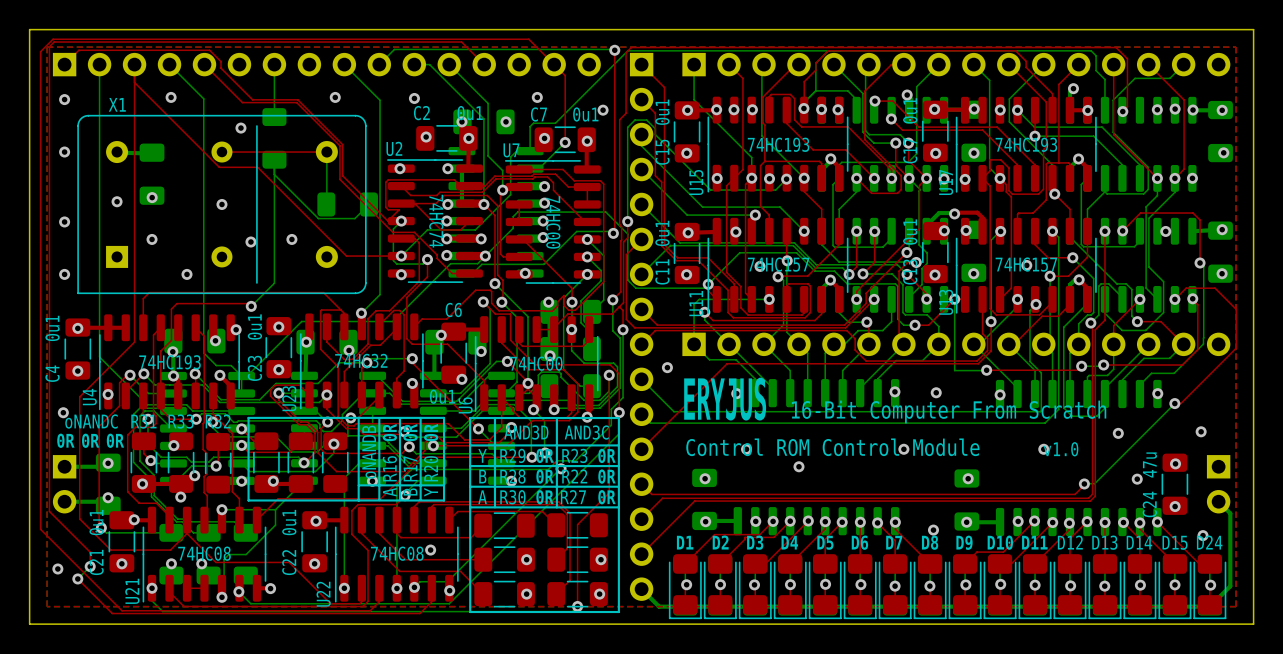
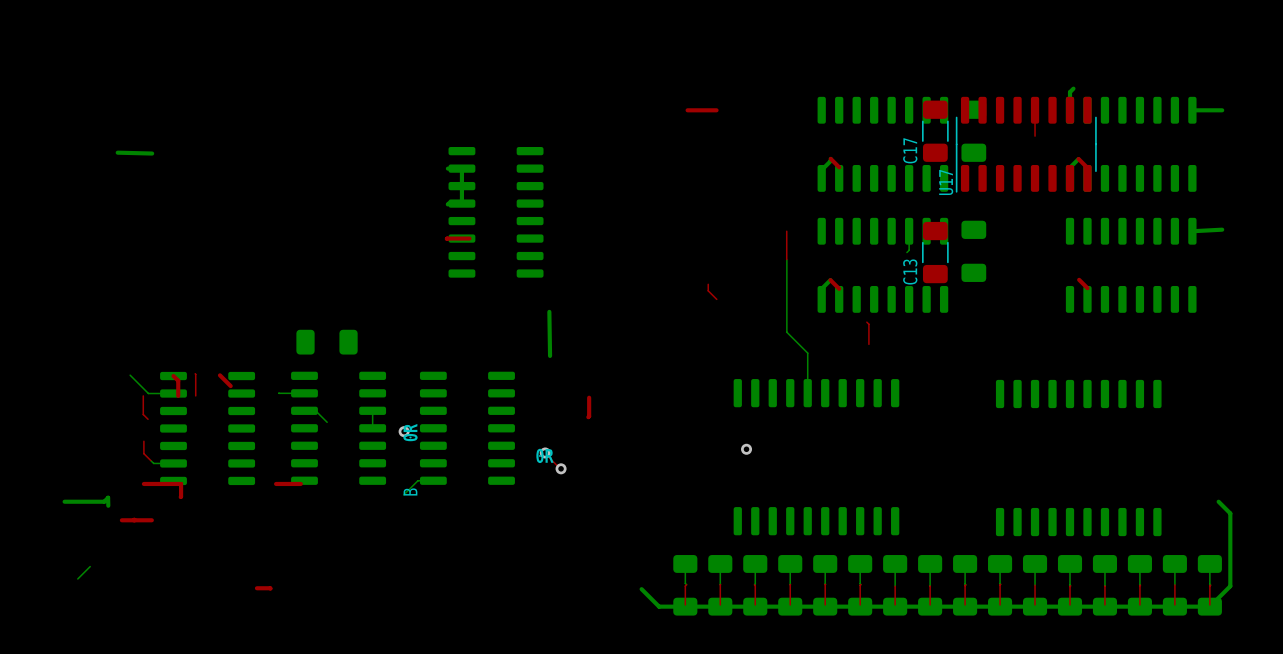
board edge: (29, 29) (1253, 29) (1253, 624) (29, 624) (29, 29) -> none
top zone outline: (47, 47) (1236, 47) (1236, 606) (47, 606) (47, 47) -> none
top track: (614, 50) (613, 233) -> none
bottom track: (614, 50) (394, 49) (379, 64) -> none
via: (614, 50) -> none
bottom track: (828, 50) (815, 63) (815, 90) (803, 102) (803, 108) -> none
top track: (64, 64) (78, 50) (209, 50) (221, 61) (221, 68) (252, 99) (297, 99) (342, 144) (342, 175) (387, 221) -> none
bottom track: (99, 64) (99, 357) (147, 404) (186, 404) (192, 411) (241, 411) -> none
top track: (134, 64) (134, 342) (79, 396) (79, 518) (110, 550) (170, 550) (186, 533) -> none
bottom track: (169, 64) (203, 98) (203, 352) (216, 365) (231, 365) (241, 376) (241, 393) -> none
top track: (204, 64) (242, 102) (296, 102) (339, 145) (339, 179) (392, 232) (414, 232) (452, 273) (469, 273) -> none
bottom track: (274, 64) (274, 117) -> none
part: (326, 64) -> none
bottom track: (344, 64) (380, 100) (380, 294) (361, 313) -> none
bottom track: (414, 64) (429, 64) (483, 118) (483, 204) -> none
bottom track: (449, 64) (488, 103) (488, 156) (502, 170) (502, 190) -> none
top track: (484, 64) (461, 42) (54, 42) (49, 46) (49, 511) (90, 552) (90, 566) -> none
top track: (641, 64) (664, 87) (664, 244) (677, 257) (708, 257) (734, 283) (734, 299) -> none
bottom track: (694, 64) (694, 99) (751, 157) (751, 178) -> none
top track: (729, 64) (742, 78) (742, 169) (726, 185) (726, 272) (740, 286) (740, 307) (748, 315) (802, 315) (804, 312) (804, 299) -> none
top track: (795, 64) (763, 96) (764, 161) -> none
bottom track: (833, 64) (862, 93) (862, 132) (873, 143) (895, 143) -> none
top track: (901, 64) (891, 64) (864, 91) (864, 139) (892, 167) -> none
bottom track: (938, 64) (916, 86) (916, 153) (908, 162) (841, 162) (839, 164) (839, 178) (833, 184) (833, 245) (834, 247) (882, 247) (891, 238) -> none
part: (956, 64) -> none
bottom track: (973, 64) (989, 80) (989, 168) (1000, 178) -> none
top track: (1008, 64) (1046, 102) (1043, 189) (1038, 194) (1012, 194) (1009, 190) (1009, 168) (1000, 159) (990, 159) (990, 170) (982, 178) (990, 185) (990, 308) (996, 314) (1039, 314) (1052, 302) -> none
bottom track: (1043, 64) (1009, 99) (1009, 121) (1054, 167) (1054, 194) -> none
top track: (1078, 64) (1058, 84) (1059, 162) -> none
top track: (1113, 64) (1113, 134) (1157, 178) -> none
top track: (1148, 64) (1184, 99) (1184, 169) (1174, 178) -> none
bottom track: (1183, 64) (1169, 78) (1135, 78) (1113, 100) (1113, 132) (1148, 167) (1148, 189) (1143, 193) (1107, 193) (1104, 191) -> none
bottom track: (761, 66) (761, 135) (804, 178) -> none
bottom track: (865, 67) (865, 130) (869, 134) (900, 134) (908, 143) -> none
top track: (134, 82) (219, 167) (257, 167) (346, 256) (401, 256) -> none
via: (1073, 88) -> none
bottom track: (815, 90) (847, 90) (856, 99) -> none
via: (907, 95) -> none
via: (171, 97) -> none
via: (335, 97) -> none
via: (537, 97) -> none
via: (414, 98) -> none
via: (64, 99) -> none
top track: (641, 99) (655, 113) (655, 175) (661, 182) (661, 245) (676, 260) (698, 260) (728, 290) (728, 312) (733, 317) (805, 317) (810, 312) (810, 286) (808, 283) (788, 283) (786, 285) (786, 299) -> none
top track: (874, 101) (892, 101) (915, 123) -> none
via: (874, 101) -> none
via: (803, 108) -> none
via: (716, 109) -> none
via: (733, 109) -> none
via: (752, 109) -> none
via: (821, 109) -> none
via: (837, 109) -> none
via: (934, 109) -> none
top track: (935, 109) (964, 109) -> none
via: (974, 109) -> none
via: (1157, 109) -> none
via: (1175, 109) -> none
via: (603, 110) -> none
via: (687, 110) -> none
top track: (769, 110) (769, 96) (771, 94) (790, 94) (794, 98) (794, 119) (801, 126) (848, 126) (891, 170) (891, 178) -> none
top track: (786, 110) (786, 123) (813, 149) (845, 149) (874, 178) -> none
top track: (804, 110) (804, 81) (815, 70) (815, 63) (828, 50) (1015, 50) (1026, 61) (1026, 67) (1052, 93) (1052, 110) -> none
text: 0u1 (910, 110) -> none
via: (1000, 110) -> none
bottom track: (1017, 110) (1034, 127) (1102, 127) (1139, 164) (1139, 178) -> none
via: (1017, 110) -> none
top track: (1070, 110) (1087, 110) -> none
via: (1087, 110) -> none
bottom track: (1104, 110) (1104, 79) (1096, 70) (1096, 55) (1091, 50) (627, 50) (555, 123) (533, 123) (530, 126) (530, 151) (516, 151) (510, 157) (510, 194) (475, 229) (427, 229) (401, 256) -> none
via: (1193, 110) -> none
via: (1222, 110) -> none
top track: (1122, 111) (1127, 106) (1127, 58) (1116, 47) (631, 47) (626, 52) (626, 113) (619, 119) (620, 291) (612, 299) -> none
via: (1122, 111) -> none
text: 0u1 (662, 112) -> none
text: 0u1 (470, 113) -> none
text: 0u1 (585, 114) -> none
top track: (891, 118) (902, 130) (982, 130) (1017, 164) (1017, 178) -> none
via: (891, 118) -> none
via: (461, 121) -> none
part: (483, 121) -> none
via: (506, 121) -> none
top track: (915, 123) (918, 127) (997, 127) (1035, 164) (1035, 178) -> none
via: (240, 128) -> none
C15: (687, 131) -> none
part: (1220, 131) -> none
bottom track: (641, 134) (641, 146) (702, 207) (780, 207) (804, 231) -> none
bottom track: (1034, 136) (1093, 136) (1122, 164) (1122, 178) -> none
via: (1034, 136) -> none
via: (426, 137) -> none
part: (274, 138) -> none
C2: (446, 138) -> none
top track: (468, 138) (468, 167) -> none
via: (468, 138) -> none
via: (544, 138) -> none
C7: (565, 139) -> none
top track: (586, 141) (586, 168) -> none
via: (587, 141) -> none
top track: (565, 142) (565, 75) (528, 39) (53, 39) (40, 51) (40, 529) (122, 610) (370, 610) (379, 601) (379, 588) -> none
bottom track: (565, 142) (539, 168) -> none
via: (565, 142) -> none
top track: (895, 143) (895, 165) (909, 178) -> none
via: (895, 143) -> none
top track: (908, 143) (908, 160) (926, 178) (919, 185) (919, 228) (856, 291) (856, 299) -> none
via: (908, 143) -> none
U15: (778, 144) -> none
text: 74HC193 (778, 144) -> none
text: 74HC193 (1026, 144) -> none
via: (64, 152) -> none
top track: (221, 152) (326, 152) -> none
bottom track: (326, 152) (326, 203) -> none
via: (1223, 152) -> none
via: (686, 153) -> none
via: (935, 153) -> none
via: (973, 153) -> none
via: (830, 158) -> none
via: (1078, 158) -> none
bottom track: (274, 159) (274, 283) (251, 306) -> none
top track: (764, 161) (760, 165) (760, 206) (769, 215) (769, 231) -> none
top track: (764, 161) (819, 161) (821, 163) (821, 178) -> none
top track: (893, 167) (901, 175) (901, 189) (897, 193) (871, 193) (856, 178) -> none
via: (399, 168) -> none
via: (447, 168) -> none
top track: (519, 169) (562, 169) (574, 180) (600, 180) (603, 184) (603, 281) (575, 310) (568, 310) (564, 305) (564, 295) (552, 311) (499, 310) (491, 303) (490, 290) (475, 290) (446, 319) (422, 319) (414, 326) -> none
bottom track: (641, 169) (687, 215) (755, 215) -> none
part: (152, 174) -> none
bottom track: (274, 174) (318, 218) (354, 218) (369, 204) -> none
via: (717, 178) -> none
top track: (751, 178) (745, 184) (745, 293) (751, 299) -> none
via: (751, 178) -> none
via: (769, 178) -> none
top track: (804, 178) (804, 191) (821, 209) (821, 231) -> none
via: (804, 178) -> none
bottom track: (856, 178) (856, 191) (839, 209) (839, 231) -> none
via: (856, 178) -> none
via: (874, 178) -> none
via: (891, 178) -> none
bottom track: (909, 178) (920, 189) (919, 244) (927, 253) (927, 263) (922, 268) (922, 284) (909, 297) -> none
via: (909, 178) -> none
via: (926, 178) -> none
top track: (1000, 178) (1006, 184) (1006, 191) (1011, 197) (1011, 288) (1000, 299) -> none
via: (1000, 178) -> none
top track: (1052, 178) (1052, 191) (1070, 209) (1070, 231) -> none
top track: (1070, 178) (1068, 162) (1046, 164) (1046, 199) (1033, 213) (1017, 214) (1017, 231) -> none
bottom track: (1087, 178) (1081, 184) (1081, 244) (1083, 246) (1134, 246) (1139, 241) -> none
bottom track: (1157, 178) (1157, 195) (1146, 206) (1146, 288) (1157, 299) -> none
via: (1157, 178) -> none
bottom track: (1174, 178) (1174, 192) (1148, 218) (1148, 266) (1163, 281) (1163, 312) (1145, 330) (1122, 330) (1104, 313) (1104, 299) -> none
via: (1174, 178) -> none
via: (1192, 178) -> none
bottom track: (786, 179) (775, 190) (710, 190) (655, 134) (655, 128) (646, 120) (635, 120) (627, 127) (627, 221) -> none
via: (786, 179) -> none
via: (944, 179) -> none
via: (965, 179) -> none
top track: (401, 186) (410, 195) (436, 195) (439, 192) (482, 192) (495, 178) (547, 176) (553, 182) (553, 190) (585, 221) -> none
top track: (460, 186) (454, 179) (388, 179) (385, 182) (385, 207) (388, 209) (399, 209) (387, 221) -> none
top track: (469, 186) (484, 186) (494, 176) (555, 174) (568, 186) (587, 186) (587, 204) -> none
top track: (519, 186) (505, 186) (500, 192) (500, 254) (503, 256) (519, 256) -> none
via: (544, 186) -> none
via: (502, 190) -> none
bottom track: (1104, 191) (1087, 209) (1087, 231) -> none
via: (1054, 194) -> none
via: (152, 197) -> none
via: (117, 201) -> none
top track: (401, 203) (436, 203) (444, 195) (487, 195) (497, 205) (497, 275) (502, 280) (501, 302) -> none
top track: (414, 203) (441, 229) (460, 229) (469, 221) -> none
top track: (469, 203) (483, 203) (494, 215) (494, 283) -> none
via: (544, 203) -> none
X1: (221, 204) -> none
via: (221, 204) -> none
part: (347, 204) -> none
via: (447, 204) -> none
via: (483, 204) -> none
top track: (519, 204) (519, 221) -> none
bottom track: (641, 204) (680, 242) (794, 242) (816, 264) (897, 264) (907, 274) -> none
top track: (954, 213) (977, 212) (982, 217) (982, 231) -> none
bottom track: (954, 213) (939, 213) (926, 225) -> none
via: (954, 213) -> none
via: (755, 215) -> none
via: (64, 221) -> none
bottom track: (401, 221) (393, 229) (393, 260) (396, 264) (423, 264) (427, 259) -> none
via: (401, 221) -> none
U2: (435, 221) -> none
text: 74HC74 (436, 221) -> none
via: (446, 221) -> none
via: (543, 221) -> none
U7: (552, 221) -> none
top track: (627, 221) (627, 237) (623, 241) (623, 302) (612, 314) (567, 314) (554, 327) -> none
via: (627, 221) -> none
text: 74HC00 (553, 222) -> none
via: (1222, 229) -> none
via: (944, 230) -> none
via: (966, 230) -> none
top track: (1122, 230) (1140, 213) (1193, 213) (1200, 220) (1200, 262) -> none
via: (1122, 230) -> none
top track: (716, 231) (688, 232) -> none
via: (804, 231) -> none
bottom track: (821, 231) (821, 244) (839, 262) (916, 262) -> none
top track: (839, 231) (839, 244) (807, 276) (779, 276) -> none
top track: (856, 231) (856, 266) (849, 274) -> none
via: (856, 231) -> none
top track: (874, 231) (874, 262) (863, 274) -> none
via: (874, 231) -> none
bottom track: (1000, 231) (991, 240) (991, 321) -> none
via: (1000, 231) -> none
top track: (1035, 231) (1035, 244) (1048, 257) (1072, 257) -> none
bottom track: (1052, 231) (1058, 237) (1058, 409) (1045, 423) (650, 423) (641, 414) -> none
via: (1052, 231) -> none
top track: (1087, 231) (1087, 257) (1068, 276) (1050, 276) -> none
top track: (1104, 231) (1104, 320) (1095, 329) (1095, 496) (1090, 501) (694, 501) (641, 554) -> none
via: (1104, 231) -> none
via: (1165, 231) -> none
via: (688, 232) -> none
via: (735, 232) -> none
text: 0u1 (910, 232) -> none
bottom track: (613, 233) (611, 231) (576, 231) (543, 264) (481, 264) (472, 273) -> none
via: (613, 233) -> none
text: 0u1 (662, 233) -> none
bottom track: (1070, 236) (1116, 283) (1126, 283) (1131, 289) (1131, 316) (1137, 321) -> none
via: (543, 237) -> none
top track: (401, 238) (414, 238) (419, 243) (419, 281) (389, 310) (376, 310) (368, 318) (368, 344) (352, 359) (344, 359) (326, 342) (326, 326) -> none
via: (446, 238) -> none
via: (481, 238) -> none
via: (152, 239) -> none
via: (291, 239) -> none
top track: (523, 239) (572, 288) (572, 304) -> none
bottom track: (587, 239) (603, 255) (603, 300) (592, 311) -> none
via: (587, 239) -> none
top track: (641, 239) (626, 254) (626, 319) (634, 327) (845, 327) (874, 299) -> none
via: (250, 242) -> none
bottom track: (670, 245) (646, 269) -> none
bottom track: (670, 245) (793, 245) (815, 267) (842, 267) (849, 274) -> none
top track: (906, 252) (866, 293) (866, 303) (844, 325) (657, 325) (641, 309) -> none
via: (906, 252) -> none
part: (1220, 252) -> none
C11: (687, 253) -> none
via: (446, 255) -> none
via: (401, 256) -> none
via: (485, 256) -> none
bottom track: (587, 256) (600, 270) (600, 280) (581, 300) (581, 322) (592, 333) (592, 349) -> none
via: (587, 256) -> none
bottom track: (1072, 257) (1093, 278) (1093, 312) (1087, 315) (1078, 323) (1078, 344) (1070, 353) (1070, 393) -> none
via: (1072, 257) -> none
top track: (427, 259) (427, 276) (406, 297) (406, 338) (412, 344) (447, 344) (484, 380) (484, 397) -> none
via: (427, 259) -> none
via: (787, 260) -> none
top track: (916, 262) (907, 262) (899, 271) (899, 339) -> none
via: (916, 262) -> none
bottom track: (1200, 262) (1203, 266) (1203, 344) (1174, 373) (1151, 373) (1139, 384) -> none
via: (1200, 262) -> none
text: 74HC157 (778, 264) -> none
text: 74HC157 (1026, 264) -> none
U11: (778, 265) -> none
U13: (1026, 265) -> none
via: (1026, 265) -> none
via: (760, 266) -> none
via: (525, 273) -> none
via: (863, 273) -> none
via: (973, 273) -> none
via: (1222, 273) -> none
via: (64, 274) -> none
via: (186, 274) -> none
via: (401, 274) -> none
bottom track: (587, 274) (563, 298) (563, 369) (580, 386) (592, 386) -> none
via: (587, 274) -> none
via: (686, 274) -> none
via: (849, 274) -> none
bottom track: (863, 274) (892, 274) (902, 284) (902, 312) (905, 314) (927, 314) (938, 326) (938, 344) (922, 360) (896, 360) (877, 379) (877, 393) -> none
top track: (907, 274) (926, 294) (926, 299) -> none
via: (907, 274) -> none
via: (935, 274) -> none
via: (778, 276) -> none
bottom track: (779, 276) (783, 280) (783, 324) (764, 344) (790, 370) (790, 393) -> none
bottom track: (1050, 276) (1050, 338) -> none
via: (1050, 276) -> none
bottom track: (1079, 279) (1074, 279) (1070, 284) (1070, 288) -> none
via: (1079, 279) -> none
via: (830, 280) -> none
bottom track: (494, 283) (528, 316) (528, 383) -> none
via: (494, 283) -> none
via: (708, 284) -> none
bottom track: (1122, 297) (1108, 283) (1101, 283) (1098, 286) (1098, 315) (1090, 323) -> none
via: (1192, 298) -> none
bottom track: (612, 299) (612, 330) (620, 337) (620, 387) (599, 408) (554, 408) -> none
via: (612, 299) -> none
bottom track: (769, 299) (699, 299) (694, 304) (694, 344) (709, 359) (736, 359) (755, 379) (755, 393) -> none
via: (769, 299) -> none
top track: (821, 299) (821, 313) (814, 320) (713, 320) (704, 312) -> none
bottom track: (839, 299) (839, 312) (848, 322) (866, 322) -> none
via: (856, 299) -> none
via: (874, 299) -> none
bottom track: (891, 299) (891, 321) (882, 330) (858, 330) (844, 344) -> none
via: (926, 299) -> none
bottom track: (944, 299) (954, 299) (954, 370) (986, 370) -> none
via: (954, 299) -> none
top track: (964, 299) (954, 299) (928, 325) (915, 325) -> none
top track: (982, 299) (982, 333) (987, 338) (987, 350) (977, 361) (866, 361) (855, 350) (855, 338) (846, 330) (655, 330) (641, 344) -> none
bottom track: (1017, 299) (1017, 306) (979, 344) -> none
via: (1017, 299) -> none
top track: (1139, 299) (1113, 325) (1113, 344) -> none
via: (1139, 299) -> none
top track: (1174, 299) (1186, 288) (1215, 288) (1236, 309) (1236, 348) (1180, 403) (1174, 403) -> none
via: (1174, 299) -> none
top track: (1192, 299) (1197, 304) (1197, 349) (1182, 365) (1103, 365) -> none
top track: (483, 301) (495, 314) (510, 314) (510, 340) (535, 364) (610, 364) (619, 373) (619, 412) -> none
bottom track: (483, 301) (490, 308) (490, 363) (460, 393) (433, 393) -> none
via: (483, 301) -> none
bottom track: (501, 302) (517, 317) (517, 382) (505, 393) -> none
via: (501, 302) -> none
via: (548, 302) -> none
via: (572, 302) -> none
bottom track: (1087, 303) (1063, 327) (1063, 407) (1072, 416) (1096, 416) (1104, 408) (1104, 393) -> none
bottom track: (572, 304) (571, 350) (584, 363) (613, 363) (617, 366) (617, 386) (598, 405) (576, 405) (571, 400) (485, 400) (474, 411) (433, 411) -> none
bottom track: (1036, 304) (1030, 310) (1030, 361) (1041, 372) (1040, 411) (673, 411) (641, 379) -> none
via: (1036, 304) -> none
top track: (1070, 304) (1058, 316) (1042, 316) (1014, 344) -> none
top track: (251, 306) (248, 303) (176, 303) (171, 309) (171, 340) (160, 351) (160, 409) (170, 419) (196, 419) -> none
via: (251, 306) -> none
top track: (619, 306) (623, 310) (623, 329) -> none
top track: (340, 310) (320, 310) (320, 349) (338, 366) (338, 416) (347, 425) (354, 425) (356, 423) (448, 423) (464, 439) (489, 439) (501, 427) (501, 397) (520, 417) (566, 417) (571, 412) (571, 397) -> none
part: (570, 311) -> none
bottom track: (704, 312) (704, 320) (772, 388) -> none
via: (704, 312) -> none
via: (361, 313) -> none
top track: (991, 321) (991, 350) (978, 363) (727, 363) (641, 449) -> none
via: (991, 321) -> none
top track: (1137, 321) (1160, 321) (1183, 344) -> none
via: (1137, 321) -> none
via: (866, 322) -> none
top track: (1090, 323) (1092, 324) (1092, 494) (1088, 498) (662, 498) (641, 519) -> none
via: (1090, 323) -> none
top track: (143, 325) (143, 298) (149, 292) (323, 292) (344, 313) (344, 326) -> none
top track: (379, 325) (393, 310) (399, 310) (404, 314) (404, 371) (396, 378) (396, 395) -> none
bottom track: (915, 325) (903, 325) (897, 319) (897, 286) (895, 283) (847, 283) (834, 271) (814, 271) (796, 252) (739, 252) (704, 288) (635, 288) (627, 280) (627, 234) (605, 212) (517, 212) (513, 216) (513, 228) (477, 263) (450, 263) (392, 321) (301, 321) (247, 376) -> none
via: (915, 325) -> none
part: (641, 326) -> none
top track: (78, 327) (125, 327) -> none
top track: (160, 327) (153, 335) (153, 413) (156, 415) (156, 423) (152, 427) (135, 427) (127, 435) (127, 491) (139, 503) (156, 503) (169, 516) -> none
top track: (195, 327) (204, 336) (203, 449) (207, 453) (207, 473) (204, 476) (204, 492) (207, 495) (207, 516) -> none
text: 0u1 (254, 327) -> none
via: (278, 327) -> none
text: 0u1 (52, 328) -> none
via: (77, 328) -> none
top track: (396, 328) (380, 345) (370, 345) (344, 371) (344, 395) -> none
via: (236, 329) -> none
top track: (455, 329) (484, 329) -> none
top track: (501, 329) (501, 342) (528, 369) (563, 369) (577, 383) (577, 412) (569, 420) (532, 420) (507, 445) (433, 445) -> none
top track: (519, 329) (519, 342) (522, 346) (583, 346) (589, 340) -> none
top track: (536, 329) (554, 329) -> none
via: (571, 329) -> none
bottom track: (623, 329) (623, 397) (611, 409) (611, 425) (575, 460) (557, 460) (548, 469) (411, 469) -> none
via: (623, 329) -> none
via: (441, 335) -> none
via: (215, 340) -> none
part: (194, 341) -> none
bottom track: (306, 342) (305, 374) -> none
via: (306, 342) -> none
bottom track: (434, 342) (434, 374) -> none
part: (455, 342) -> none
bottom track: (833, 344) (825, 353) (825, 393) -> none
bottom track: (868, 344) (842, 370) (842, 393) -> none
bottom track: (903, 344) (860, 388) -> none
part: (956, 344) -> none
bottom track: (973, 344) (1017, 388) -> none
bottom track: (1008, 344) (1035, 370) (1035, 393) -> none
bottom track: (1043, 344) (1052, 353) (1052, 393) -> none
bottom track: (1113, 344) (1113, 369) (1107, 375) (1089, 375) (1087, 393) -> none
bottom track: (1148, 344) (1104, 388) -> none
bottom track: (1183, 344) (1169, 358) (1143, 358) (1122, 379) (1122, 393) -> none
C23: (278, 347) -> none
C4: (77, 349) -> none
part: (570, 349) -> none
via: (349, 350) -> none
via: (172, 351) -> none
bottom track: (173, 351) (173, 375) -> none
via: (481, 351) -> none
C6: (453, 353) -> none
via: (550, 355) -> none
top track: (412, 358) (412, 362) (478, 428) -> none
bottom track: (412, 358) (371, 358) (366, 362) (338, 362) (318, 383) (276, 383) (259, 399) (221, 399) (195, 373) -> none
via: (412, 358) -> none
text: 74HC32 (361, 360) -> none
U23: (361, 361) -> none
top track: (507, 361) (528, 382) (528, 389) (536, 397) -> none
bottom track: (507, 361) (496, 361) (456, 401) (402, 401) (377, 375) -> none
via: (507, 361) -> none
U4: (169, 362) -> none
text: 74HC193 (170, 362) -> none
top track: (366, 362) (361, 367) (361, 395) -> none
via: (366, 362) -> none
text: 74HC00 (536, 363) -> none
U6: (536, 364) -> none
bottom track: (1103, 365) (1081, 366) -> none
via: (1103, 365) -> none
top track: (1081, 366) (1077, 370) (986, 370) -> none
via: (1081, 366) -> none
via: (667, 367) -> none
via: (278, 369) -> none
via: (986, 370) -> none
via: (77, 371) -> none
top track: (143, 373) (125, 391) -> none
bottom track: (143, 373) (154, 384) (169, 384) -> none
via: (143, 373) -> none
via: (195, 373) -> none
top track: (130, 375) (127, 375) (119, 382) (119, 405) (99, 426) (99, 525) (101, 527) -> none
via: (130, 375) -> none
via: (219, 375) -> none
bottom track: (488, 375) (460, 404) (400, 404) (389, 393) (372, 393) -> none
top track: (609, 375) (609, 492) (577, 524) (577, 606) -> none
bottom track: (609, 375) (609, 391) (599, 400) (584, 400) (561, 377) (559, 372) (541, 372) (538, 375) (538, 384) (529, 393) (501, 393) -> none
via: (609, 375) -> none
via: (173, 376) -> none
via: (461, 379) -> none
via: (412, 383) -> none
via: (528, 383) -> none
bottom track: (169, 384) (202, 384) (219, 402) (319, 402) (326, 395) -> none
part: (570, 386) -> none
top track: (528, 388) (519, 397) -> none
via: (894, 391) -> none
via: (936, 392) -> none
top track: (278, 393) (278, 399) (300, 422) (307, 422) (317, 432) (317, 452) (336, 471) (404, 471) (425, 450) (425, 442) (430, 437) (438, 437) (444, 442) (499, 442) (514, 427) -> none
via: (278, 393) -> none
bottom track: (363, 393) (342, 414) (342, 420) (331, 431) (323, 431) (316, 420) (233, 422) (225, 413) (201, 413) (196, 419) -> none
via: (736, 393) -> none
via: (1157, 393) -> none
via: (108, 394) -> none
via: (1000, 394) -> none
top track: (213, 395) (213, 414) (232, 433) (232, 491) (239, 498) (239, 520) -> none
top track: (309, 395) (299, 385) (275, 385) (270, 390) (270, 396) (299, 424) (306, 424) (314, 433) (314, 452) (304, 463) -> none
top track: (326, 395) (326, 409) (346, 428) (357, 428) (363, 434) (401, 434) (404, 431) -> none
via: (326, 395) -> none
top track: (379, 396) (358, 417) (350, 417) -> none
text: 0u1 (442, 396) -> none
text: ERYJUS (725, 399) -> none
bottom track: (1174, 403) (1094, 483) (1085, 483) -> none
via: (1174, 403) -> none
bottom track: (170, 408) (139, 408) (133, 414) (133, 462) (151, 480) (151, 496) (176, 521) (182, 521) (193, 532) (205, 532) -> none
via: (533, 409) -> none
via: (554, 409) -> none
bottom track: (501, 410) (482, 410) (456, 437) (409, 437) (404, 431) -> none
bottom track: (534, 411) (544, 420) (544, 452) -> none
via: (63, 412) -> none
bottom track: (619, 412) (619, 433) (449, 603) (250, 603) (238, 591) -> none
via: (619, 412) -> none
text: 16-Bit Computer From Scratch (949, 412) -> none
line: (248, 417) (248, 500) (444, 500) (444, 417) (248, 417) -> none
bottom track: (350, 417) (347, 420) (347, 435) -> none
via: (350, 417) -> none
line: (358, 417) (358, 500) -> none
line: (420, 417) (420, 499) -> none
line: (494, 417) (494, 507) -> none
via: (587, 417) -> none
line: (379, 418) (379, 500) -> none
line: (399, 418) (399, 500) -> none
line: (556, 418) (556, 507) -> none
bottom track: (148, 419) (148, 444) (161, 457) (186, 457) (191, 461) (209, 461) (213, 457) (298, 457) (304, 462) -> none
via: (148, 419) -> none
via: (196, 419) -> none
text: oNANDC (91, 421) -> none
bottom track: (212, 422) (212, 427) (222, 436) (276, 436) (291, 451) (317, 451) (330, 435) (381, 435) (389, 442) -> none
via: (212, 422) -> none
top track: (327, 422) (321, 428) (321, 449) (325, 453) (402, 453) (409, 445) -> none
via: (327, 422) -> none
via: (511, 427) -> none
bottom track: (171, 428) (154, 411) (145, 411) (140, 415) (140, 461) (154, 475) (154, 495) (177, 519) (183, 519) (186, 521) (234, 521) (245, 532) -> none
top track: (241, 428) (254, 441) (266, 441) -> none
via: (241, 428) -> none
bottom track: (433, 428) (461, 428) (485, 404) (514, 404) (531, 421) (531, 457) -> none
bottom track: (478, 428) (495, 445) -> none
via: (478, 428) -> none
via: (1201, 431) -> none
text: 0R (389, 432) -> none
text: 0R (431, 432) -> none
text: AND3D (526, 432) -> none
text: AND3C (586, 432) -> none
via: (1118, 433) -> none
text: 0R (65, 440) -> none
text: 0R (90, 440) -> none
text: 0R (115, 440) -> none
top track: (218, 441) (218, 464) (216, 466) -> none
top track: (300, 441) (289, 452) (248, 452) (241, 445) -> none
bottom track: (389, 443) (409, 463) (433, 463) -> none
bottom track: (333, 444) (333, 453) (315, 471) (249, 471) (241, 463) -> none
via: (333, 444) -> none
via: (173, 445) -> none
via: (241, 445) -> none
bottom track: (372, 445) (387, 445) (411, 469) -> none
via: (433, 445) -> none
line: (470, 445) (618, 445) -> none
bottom track: (409, 446) (416, 453) (492, 453) (501, 463) -> none
via: (409, 446) -> none
text: Control ROM Control Module (832, 447) -> none
via: (903, 449) -> none
via: (1043, 449) -> none
text: v1.0 (1061, 449) -> none
text: oNANDB (369, 452) -> none
text: Y (482, 455) -> none
text: 0R (606, 455) -> none
top track: (531, 457) (422, 457) (380, 498) (278, 498) (256, 520) -> none
via: (532, 457) -> none
via: (150, 460) -> none
R31: (143, 462) -> none
R33: (181, 462) -> none
R16: (266, 462) -> none
R17: (300, 462) -> none
via: (304, 462) -> none
R20: (335, 462) -> none
via: (108, 463) -> none
R32: (218, 463) -> none
bottom track: (372, 463) (359, 463) (344, 478) (344, 588) -> none
via: (1175, 463) -> none
text: 47u (1149, 464) -> none
bottom track: (64, 466) (104, 466) -> none
bottom track: (216, 466) (191, 466) (176, 480) -> none
via: (216, 466) -> none
line: (470, 466) (618, 466) -> none
via: (798, 466) -> none
bottom track: (560, 468) (447, 581) (420, 581) (414, 587) -> none
bottom track: (411, 469) (396, 484) (396, 588) -> none
via: (194, 475) -> none
text: B (482, 476) -> none
text: 0R (545, 476) -> none
text: 0R (606, 476) -> none
via: (705, 478) -> none
via: (968, 478) -> none
via: (1137, 479) -> none
bottom track: (304, 480) (275, 509) -> none
via: (241, 481) -> none
via: (273, 481) -> none
via: (372, 481) -> none
via: (511, 481) -> none
via: (142, 483) -> none
via: (1084, 483) -> none
part: (64, 484) -> none
part: (108, 484) -> none
top track: (641, 484) (651, 494) (1075, 494) (1085, 484) -> none
C24: (1174, 484) -> none
part: (1218, 484) -> none
line: (358, 485) (444, 485) -> none
line: (470, 486) (617, 486) -> none
text: A (389, 492) -> none
text: Y (431, 492) -> none
top track: (405, 495) (396, 504) (358, 504) (351, 510) (351, 534) (368, 550) (368, 601) (362, 606) (183, 606) (169, 592) -> none
via: (405, 495) -> none
via: (108, 497) -> none
via: (180, 497) -> none
text: A (482, 497) -> none
text: 0R (545, 497) -> none
text: 0R (606, 497) -> none
part: (704, 499) -> none
part: (966, 499) -> none
via: (1175, 506) -> none
line: (470, 507) (470, 612) (618, 612) (618, 418) (470, 418) (470, 507) -> none
line: (470, 507) (618, 507) -> none
bottom track: (221, 509) (275, 509) -> none
via: (221, 509) -> none
bottom track: (275, 509) (275, 525) (246, 554) (228, 554) (224, 559) (224, 595) (221, 597) -> none
via: (134, 519) -> none
top track: (316, 520) (344, 520) -> none
top track: (361, 520) (361, 533) (399, 571) (460, 571) (483, 594) -> none
top track: (379, 520) (379, 533) (405, 559) (483, 559) -> none
top track: (396, 520) (396, 533) (400, 537) (471, 537) (483, 525) -> none
top track: (414, 520) (414, 506) (419, 501) (558, 501) (570, 513) (570, 580) (556, 594) -> none
top track: (431, 520) (431, 506) (433, 504) (557, 504) (567, 514) (567, 548) (556, 559) -> none
top track: (449, 520) (457, 511) (542, 511) (556, 525) -> none
bottom track: (704, 520) (737, 520) -> none
via: (316, 521) -> none
via: (705, 521) -> none
via: (755, 521) -> none
top track: (773, 521) (759, 534) (714, 534) (685, 563) -> none
via: (773, 521) -> none
top track: (790, 521) (774, 537) (745, 537) (720, 563) -> none
via: (790, 521) -> none
top track: (808, 521) (765, 563) -> none
via: (808, 521) -> none
top track: (825, 521) (825, 528) (790, 563) -> none
via: (825, 521) -> none
via: (1018, 521) -> none
top track: (1034, 521) (1003, 552) (976, 552) (965, 563) -> none
via: (1034, 521) -> none
top track: (1087, 521) (1070, 538) (1070, 563) -> none
via: (1087, 521) -> none
text: 0u1 (96, 522) -> none
text: 0u1 (289, 522) -> none
top track: (842, 522) (825, 539) (825, 563) -> none
via: (842, 522) -> none
top track: (860, 522) (860, 563) -> none
via: (860, 522) -> none
top track: (877, 522) (895, 540) (895, 563) -> none
via: (877, 522) -> none
top track: (895, 522) (895, 529) (930, 563) -> none
via: (895, 522) -> none
bottom track: (966, 522) (999, 522) -> none
via: (966, 522) -> none
top track: (1052, 522) (1011, 563) -> none
via: (1052, 522) -> none
top track: (1104, 522) (1104, 563) -> none
via: (1105, 522) -> none
top track: (1123, 522) (1139, 538) (1139, 563) -> none
via: (1123, 522) -> none
top track: (1139, 522) (1139, 528) (1174, 563) -> none
via: (1139, 522) -> none
top track: (1157, 522) (1199, 563) -> none
via: (1157, 522) -> none
top track: (1069, 523) (1069, 529) (1035, 563) -> none
via: (1069, 523) -> none
R29: (504, 525) -> none
R23: (577, 525) -> none
bottom track: (101, 527) (106, 532) (171, 532) -> none
via: (101, 527) -> none
via: (933, 530) -> none
top track: (186, 533) (215, 562) (289, 562) (330, 603) (359, 603) (361, 601) (361, 588) -> none
via: (1203, 535) -> none
C21: (121, 541) -> none
C22: (314, 541) -> none
via: (430, 550) -> none
text: 74HC08 (204, 553) -> none
text: 74HC08 (397, 553) -> none
part: (171, 554) -> none
U21: (204, 554) -> none
part: (208, 554) -> none
part: (245, 554) -> none
U22: (396, 554) -> none
R28: (504, 559) -> none
via: (526, 559) -> none
R22: (577, 559) -> none
via: (600, 559) -> none
via: (121, 563) -> none
via: (171, 563) -> none
via: (201, 563) -> none
via: (314, 563) -> none
via: (90, 566) -> none
via: (57, 568) -> none
top track: (77, 578) (112, 613) (419, 613) (431, 601) (431, 588) -> none
via: (77, 578) -> none
via: (686, 584) -> none
via: (720, 584) -> none
via: (754, 584) -> none
via: (790, 584) -> none
via: (825, 584) -> none
via: (860, 584) -> none
via: (965, 584) -> none
via: (1000, 584) -> none
via: (1174, 584) -> none
via: (1035, 585) -> none
via: (1070, 585) -> none
via: (1140, 585) -> none
via: (1210, 585) -> none
D1: (685, 586) -> none
D2: (720, 586) -> none
D3: (755, 586) -> none
D4: (790, 586) -> none
D5: (825, 586) -> none
D6: (860, 586) -> none
D7: (895, 586) -> none
via: (895, 586) -> none
via: (929, 586) -> none
D8: (930, 586) -> none
D9: (965, 586) -> none
D10: (1000, 586) -> none
D11: (1035, 586) -> none
D12: (1070, 586) -> none
D13: (1104, 586) -> none
via: (1104, 586) -> none
D14: (1139, 586) -> none
D15: (1174, 586) -> none
D24: (1209, 586) -> none
via: (414, 587) -> none
bottom track: (152, 588) (152, 600) (162, 611) (572, 611) (577, 606) -> none
via: (152, 588) -> none
top track: (186, 588) (204, 588) -> none
via: (270, 588) -> none
via: (344, 588) -> none
via: (396, 588) -> none
via: (449, 590) -> none
via: (238, 591) -> none
R30: (504, 594) -> none
via: (526, 594) -> none
R27: (577, 594) -> none
via: (599, 594) -> none
via: (221, 597) -> none
via: (577, 606) -> none

